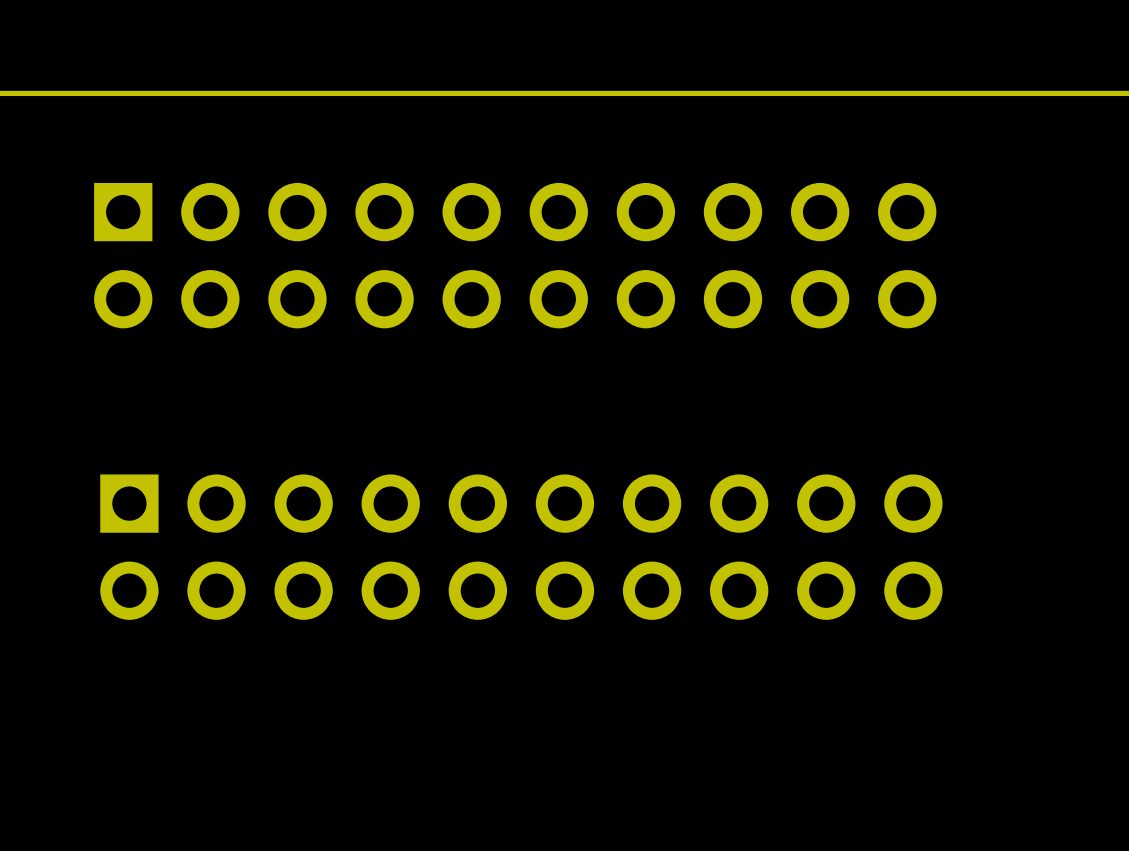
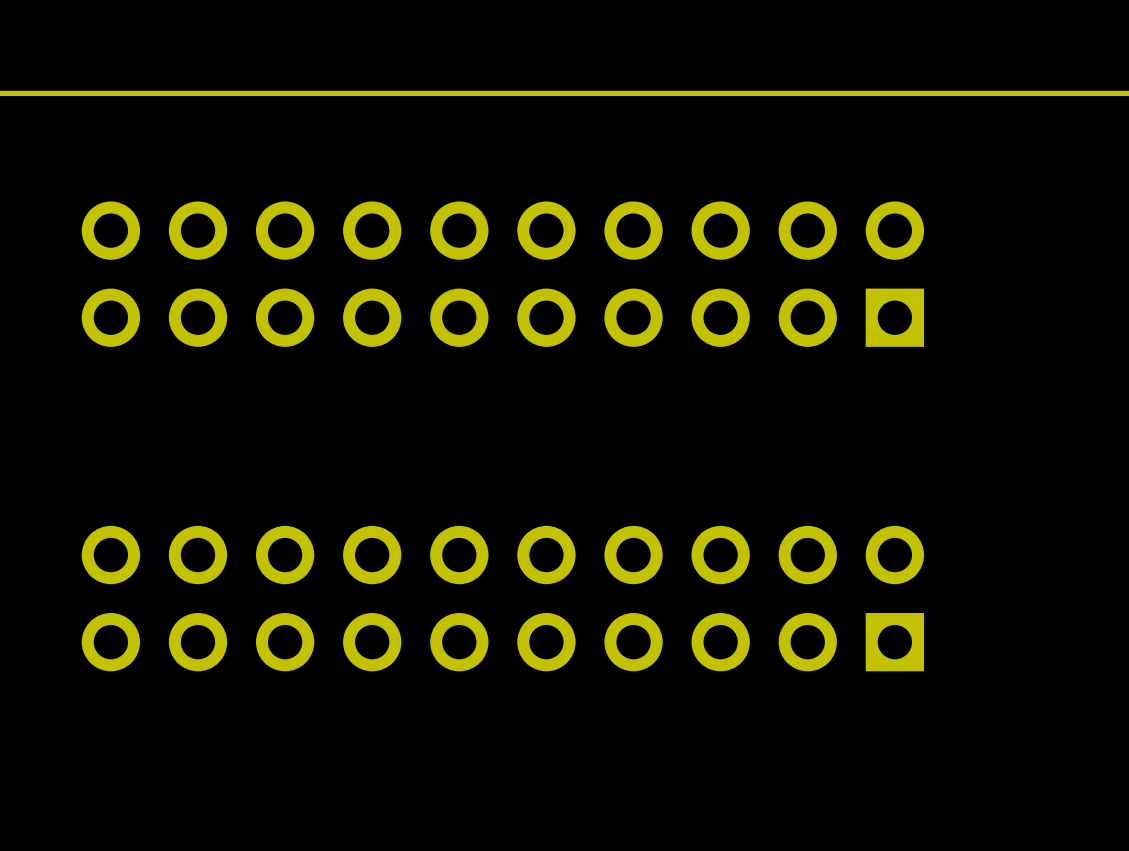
part rotation: 0° (515, 255) -> 180° (502, 274)
part rotation: 0° (521, 547) -> 180° (502, 598)

